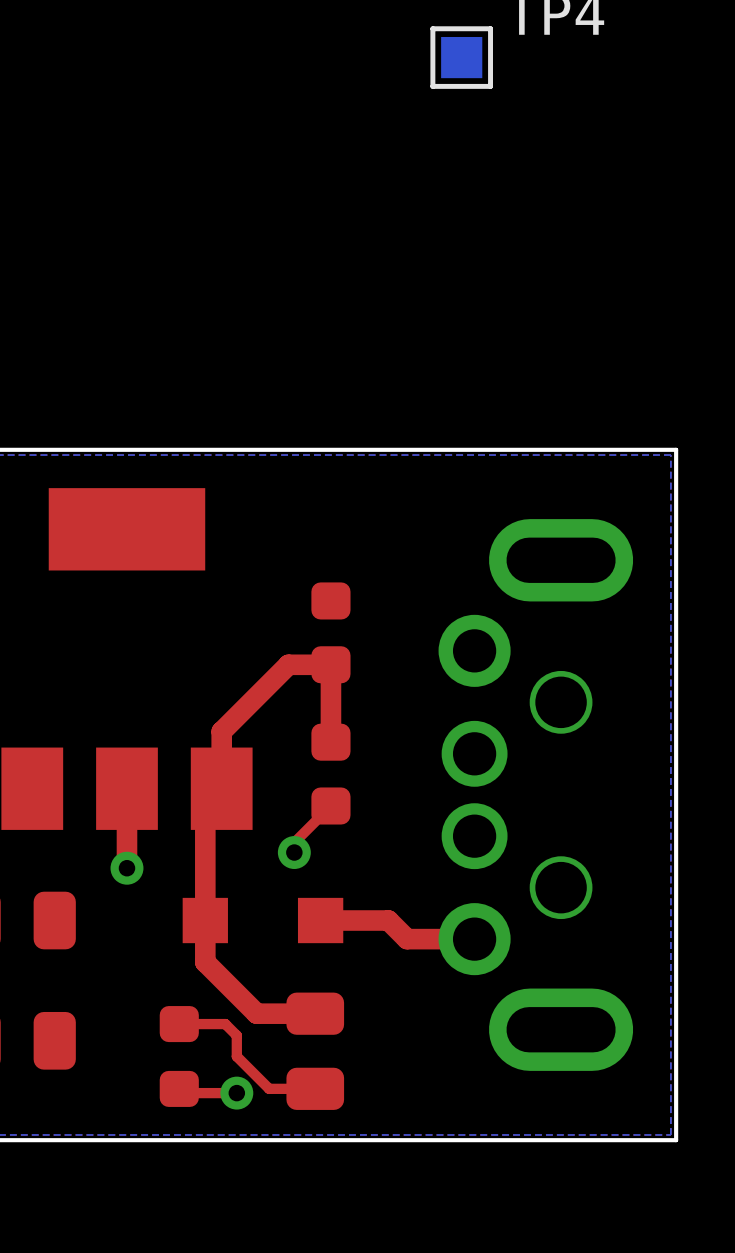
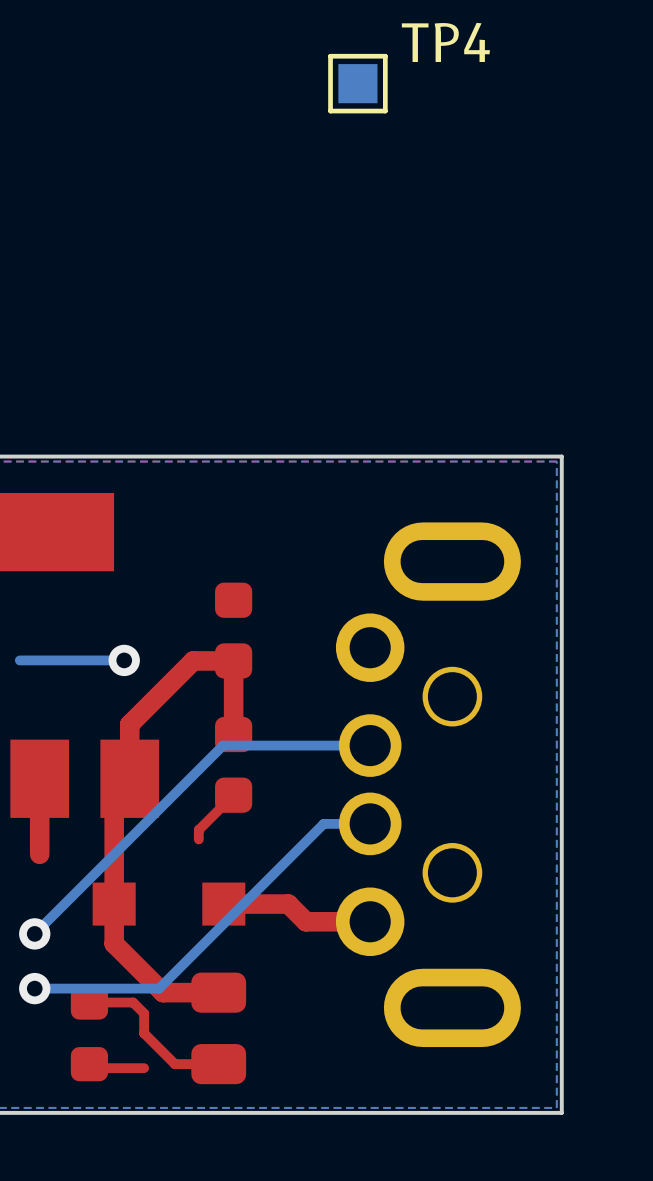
bottom track: none -> (124, 660) (19, 660)
via: none -> (124, 660)
bottom track: none -> (370, 745) (223, 745) (34, 933)
bottom track: none -> (370, 823) (323, 823) (159, 988) (34, 988)
via: (294, 852) -> none
via: (126, 868) -> none
via: none -> (34, 933)
via: none -> (34, 988)
via: (236, 1093) -> none

